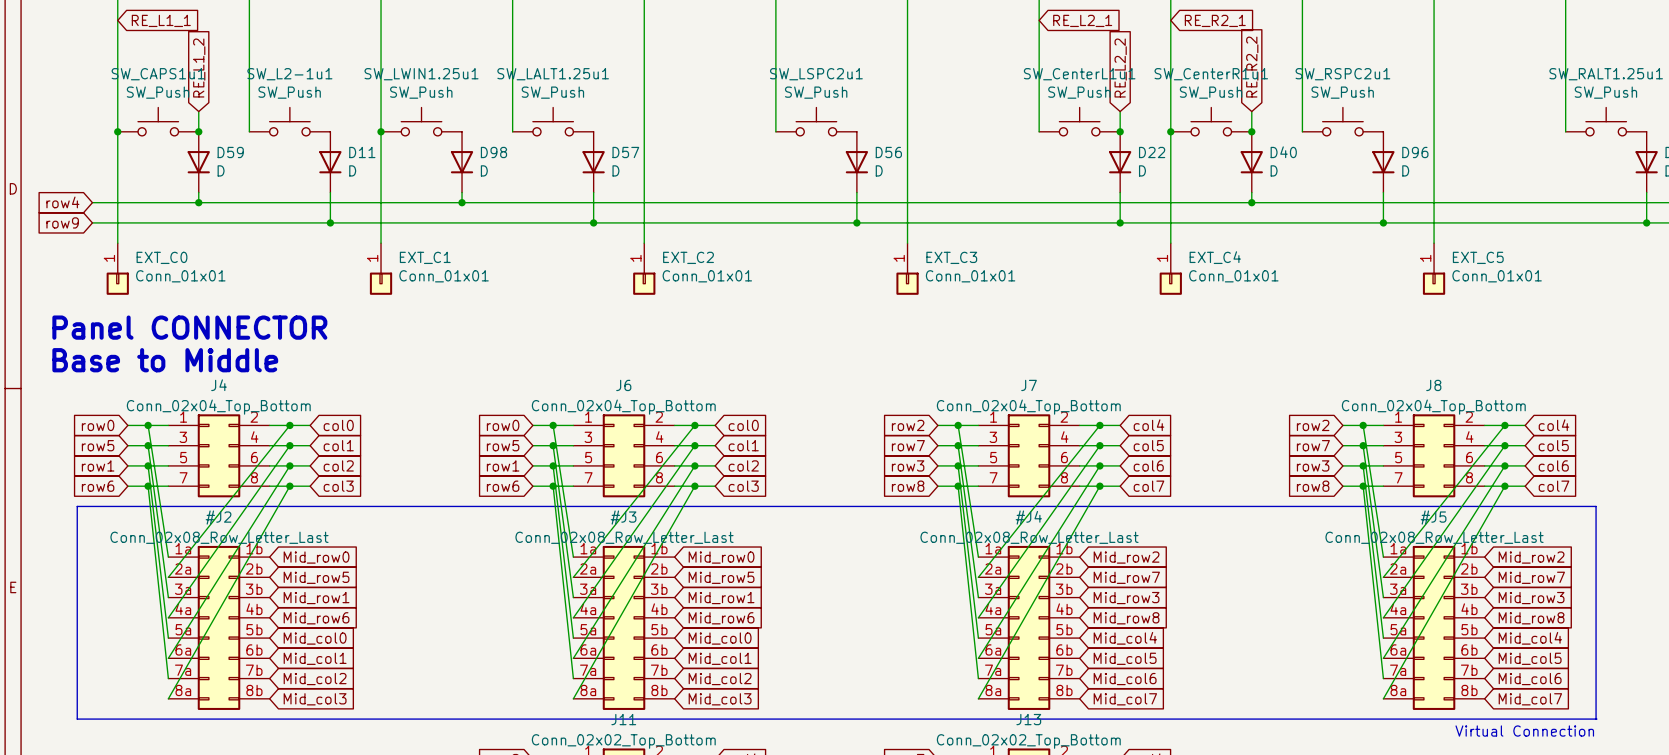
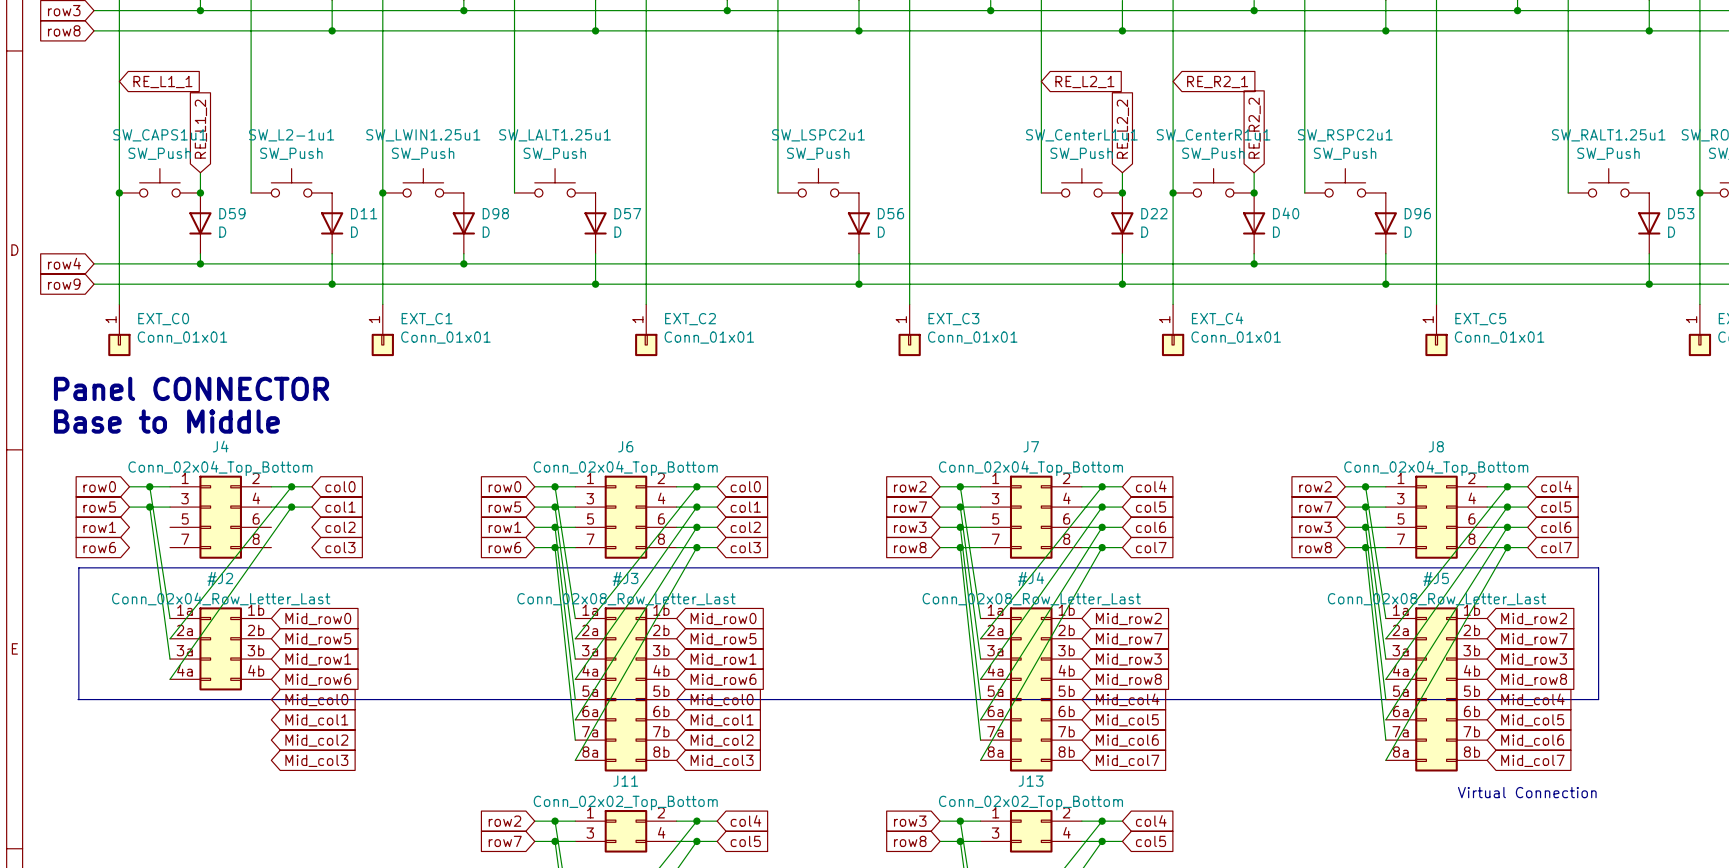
wire: (127, 465) (168, 465) -> none
wire: (148, 465) (168, 638) -> none
junction: (148, 465) -> none
wire: (269, 465) (310, 465) -> none
wire: (289, 465) (168, 658) -> none
junction: (289, 465) -> none
wire: (127, 486) (168, 486) -> none
wire: (148, 486) (168, 678) -> none
junction: (148, 486) -> none
wire: (269, 486) (310, 486) -> none
wire: (289, 486) (168, 698) -> none
junction: (289, 486) -> none
power symbol: Conn_02x08_Row_Letter_Last (219, 627) -> Conn_02x04_Row_Letter_Last (220, 648)
line: (77, 638) (77, 719) (1596, 719) -> none
line: (1596, 638) (1596, 719) -> (1598, 699) (77, 699)

